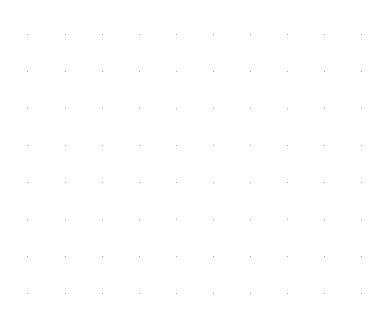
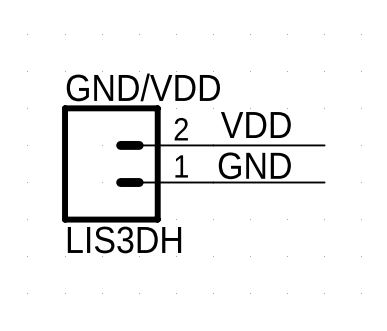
label: none -> VDD (255, 125)
wire: none -> (213, 145) (324, 145)
GND/VDD: none -> LIS3DH (137, 163)
label: none -> GND (254, 165)
wire: none -> (213, 182) (324, 182)

